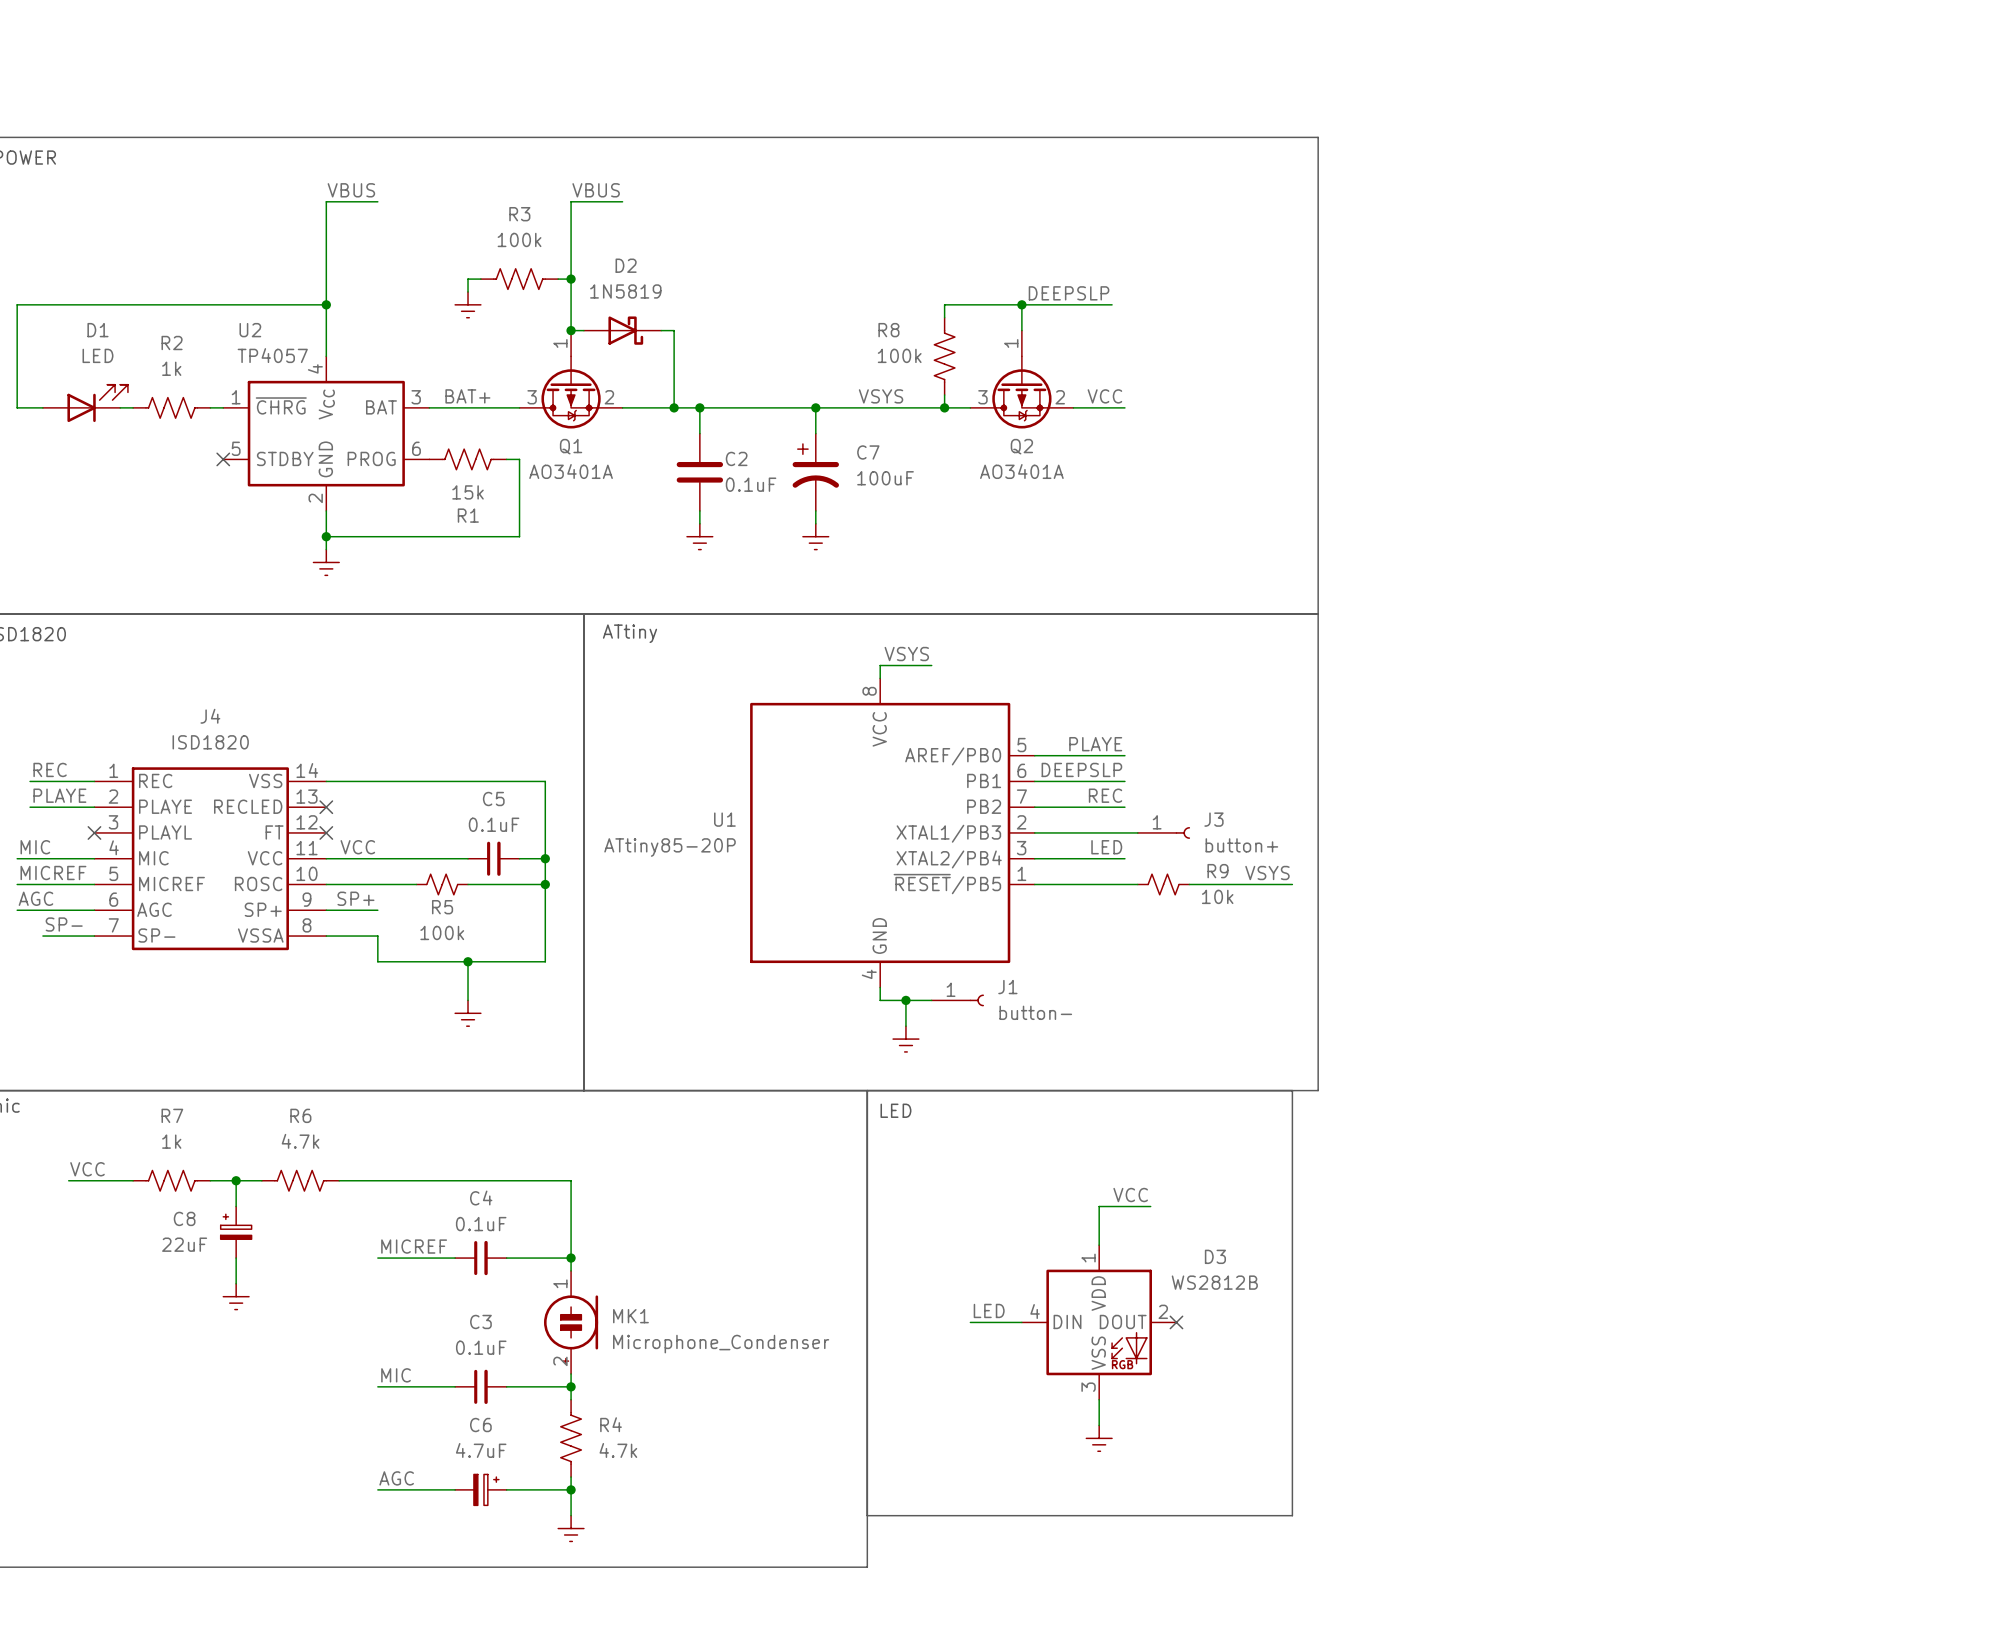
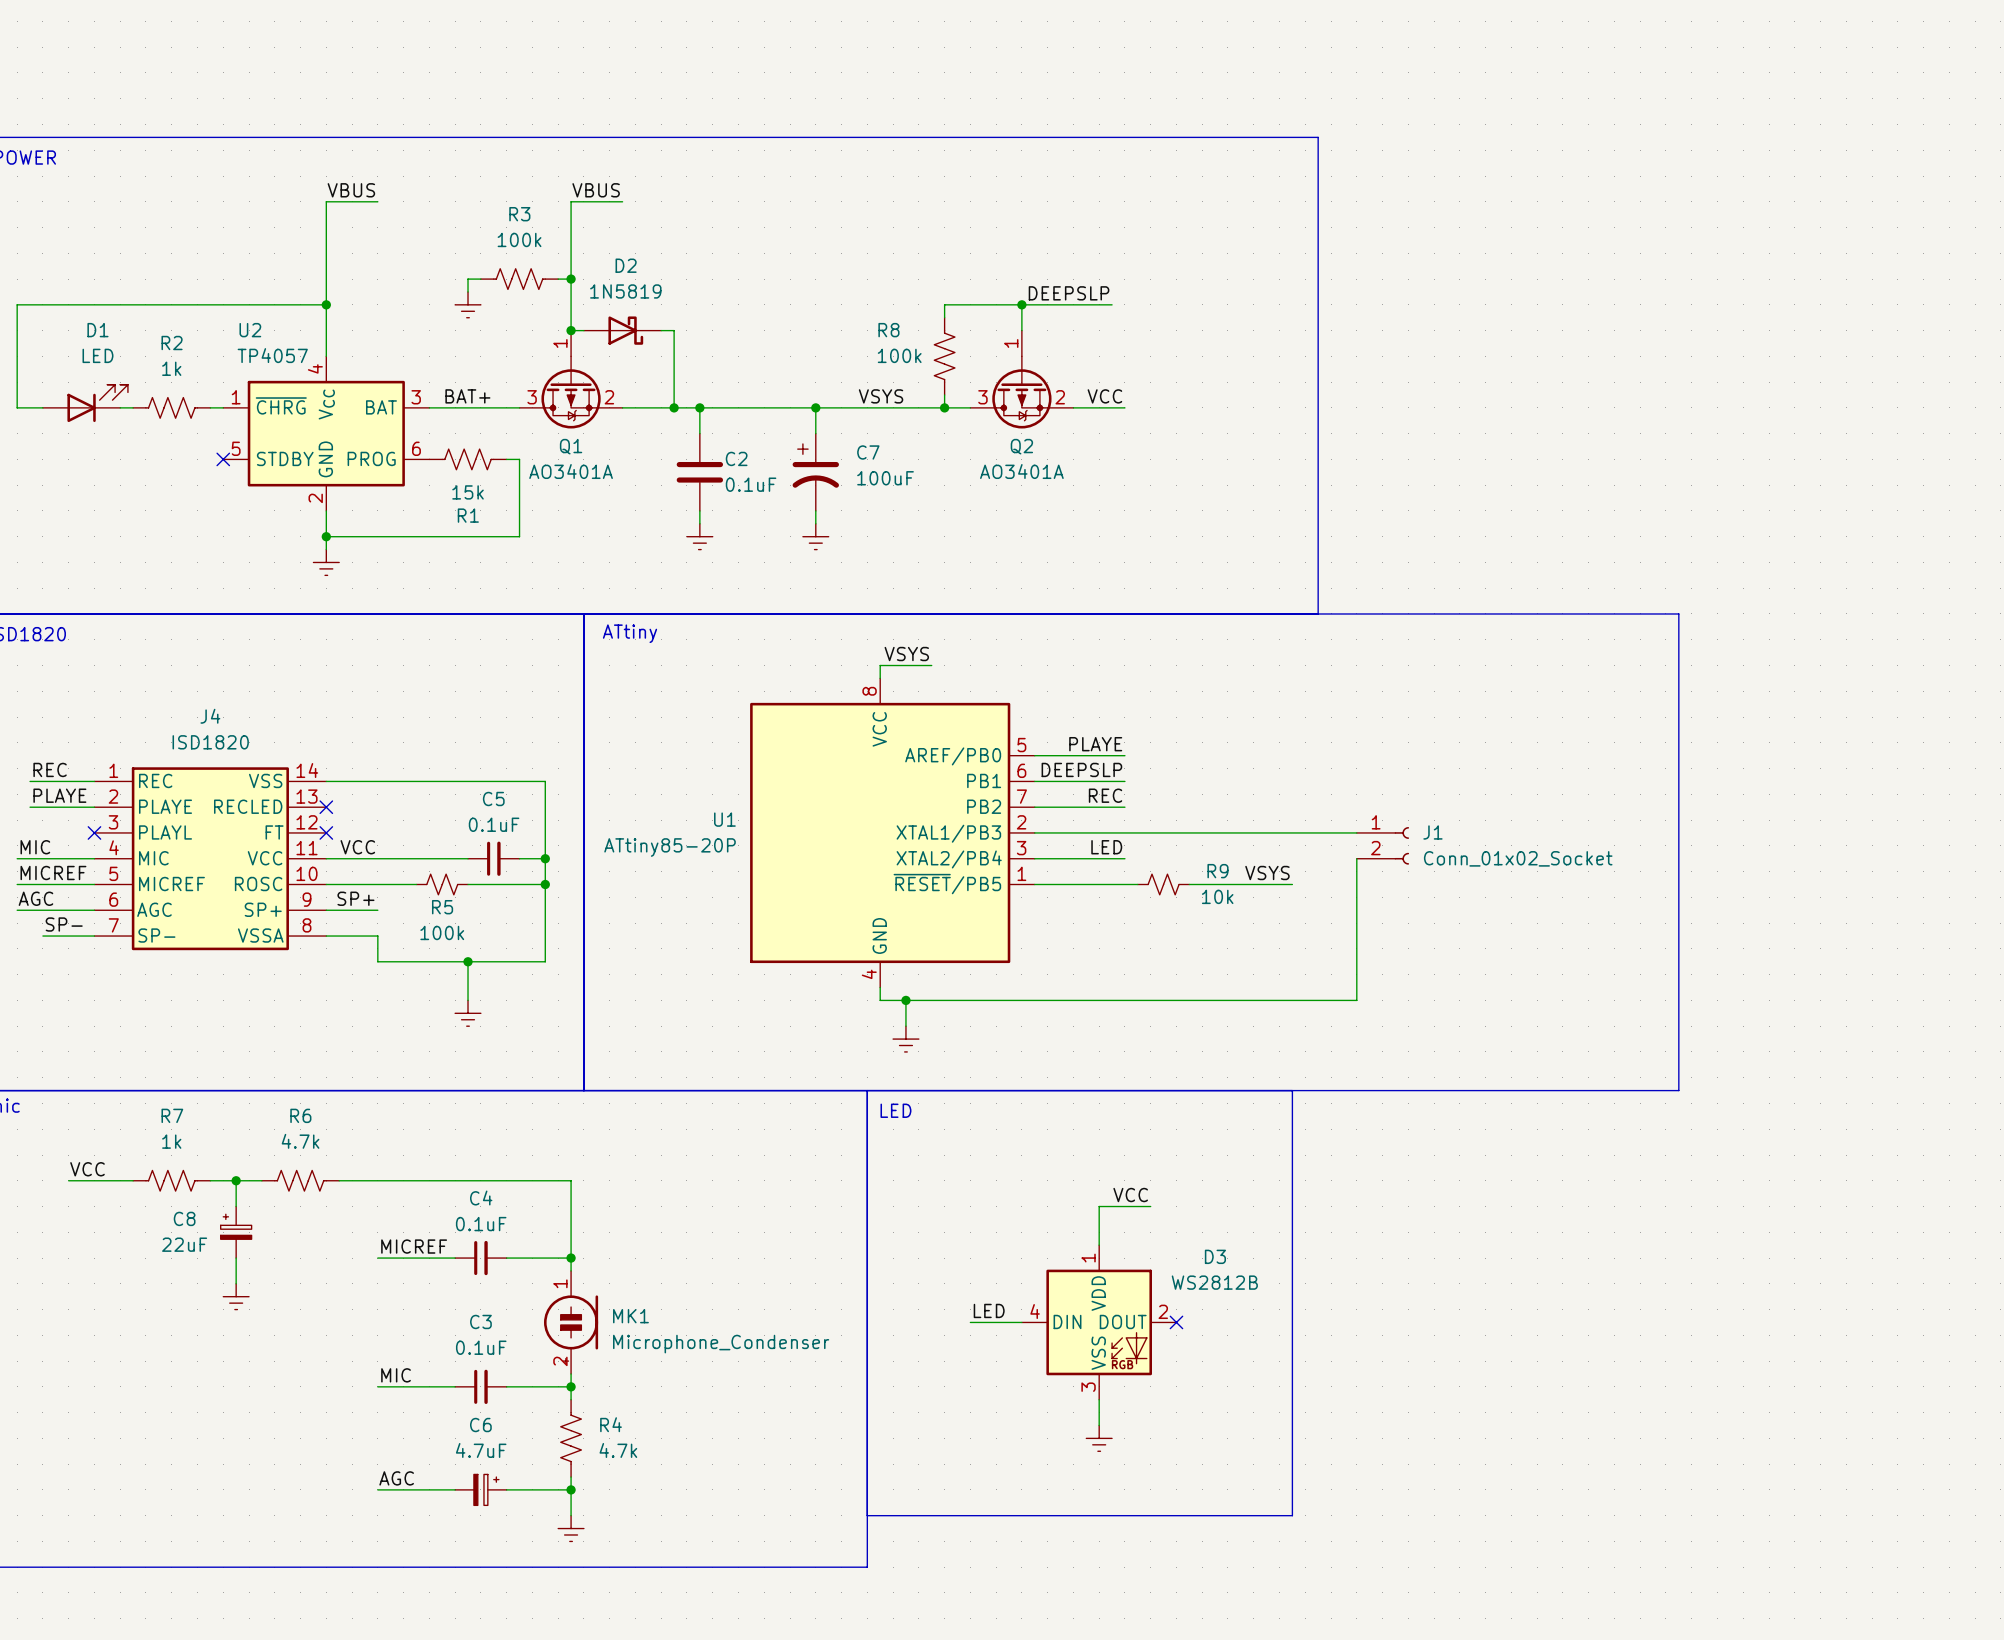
line: (1318, 613) (1318, 1090) -> (1318, 613) (1678, 613) (1678, 1090) (1318, 1090)
wire: none -> (1137, 832) (1356, 832)
J3: button+ (1163, 832) -> none
wire: none -> (1356, 858) (1356, 1000) (931, 1000)
J1 symbol: [931, 994, 985, 1007] -> [1356, 827, 1410, 865]
J1 value: button- (1035, 1012) -> Conn_01x02_Socket (1518, 858)

